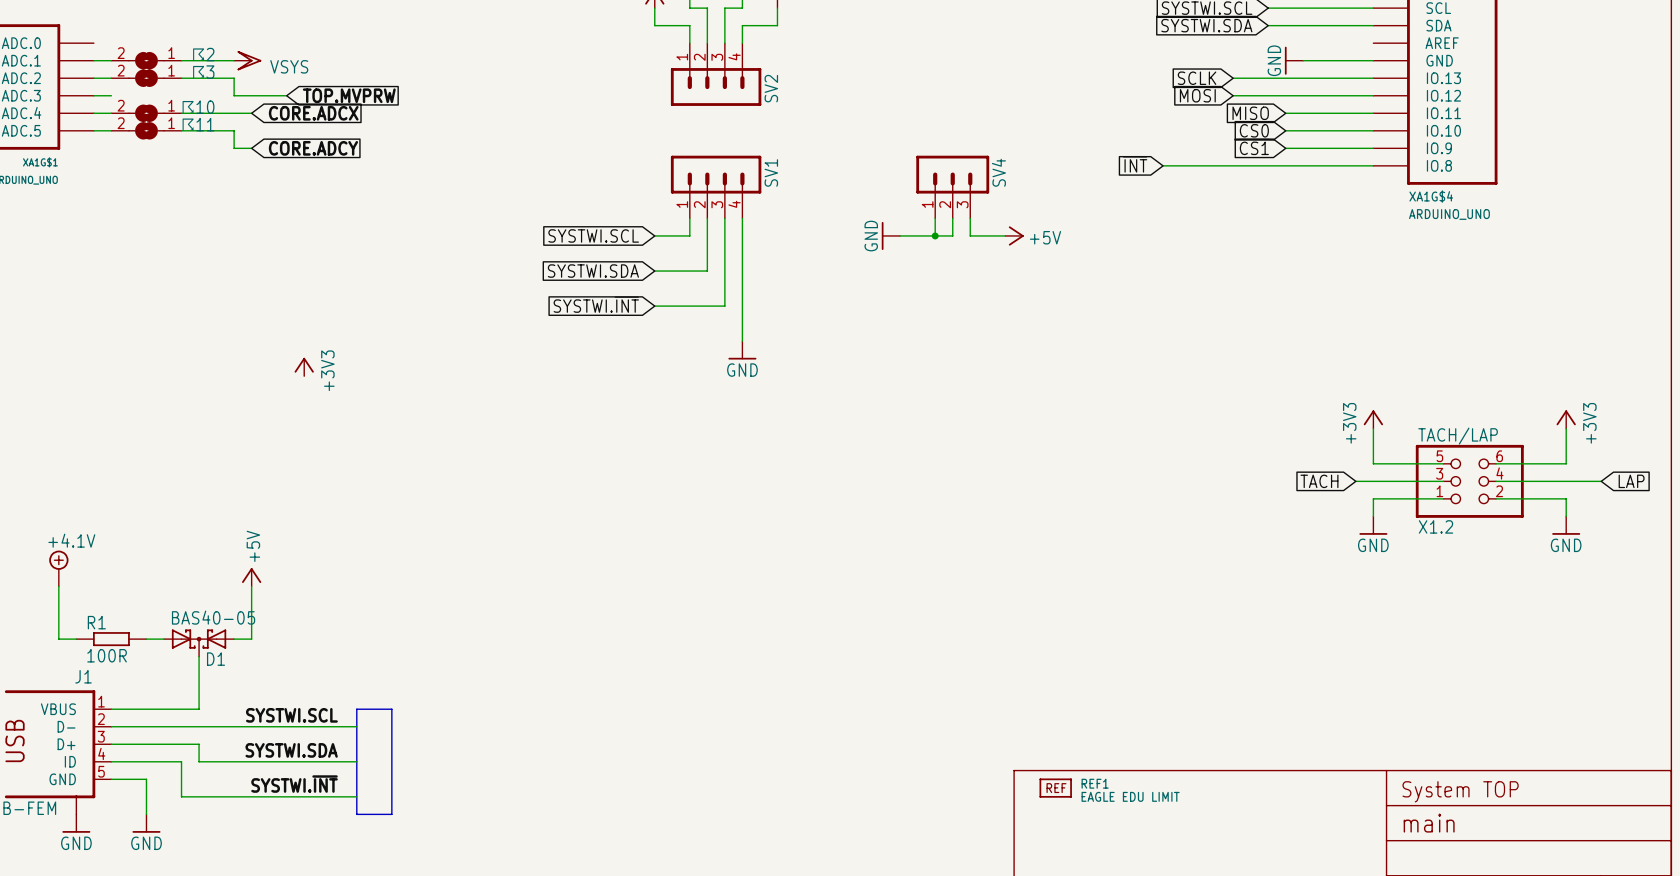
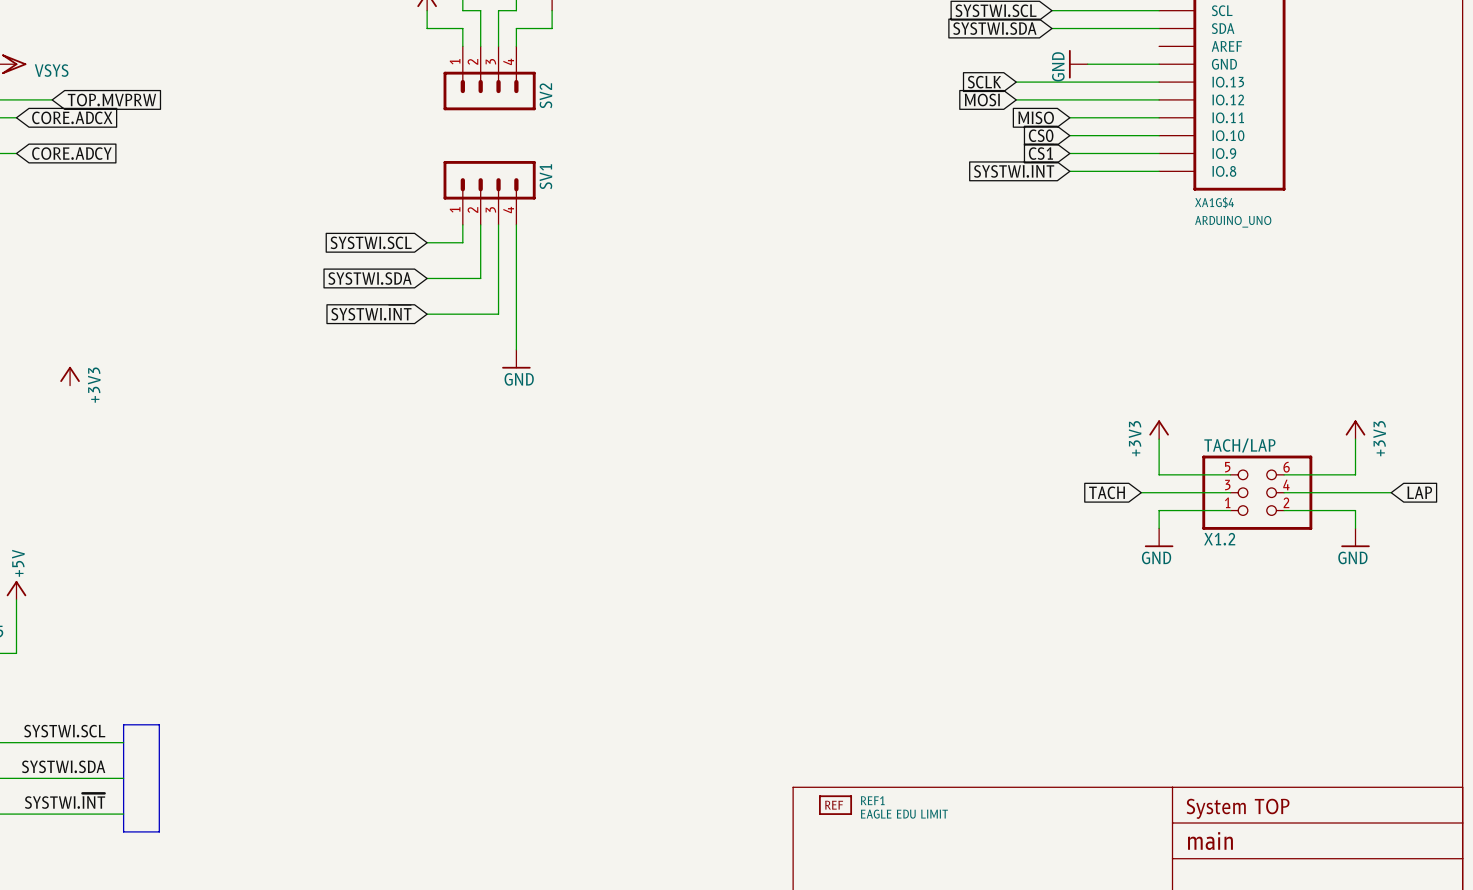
global label: ~{INT} (1135, 164) -> SYSTWI.~{INT} (1014, 169)
wire: (1163, 165) (1285, 165) -> none
SV4: (952, 187) -> none
wire: (935, 218) (935, 235) -> none
wire: (952, 218) (952, 235) (900, 235) -> none
wire: (970, 218) (970, 235) (1005, 235) -> none
power symbol: GND (890, 235) -> none
junction: (935, 235) -> none
power symbol: +5V (1014, 235) -> none

